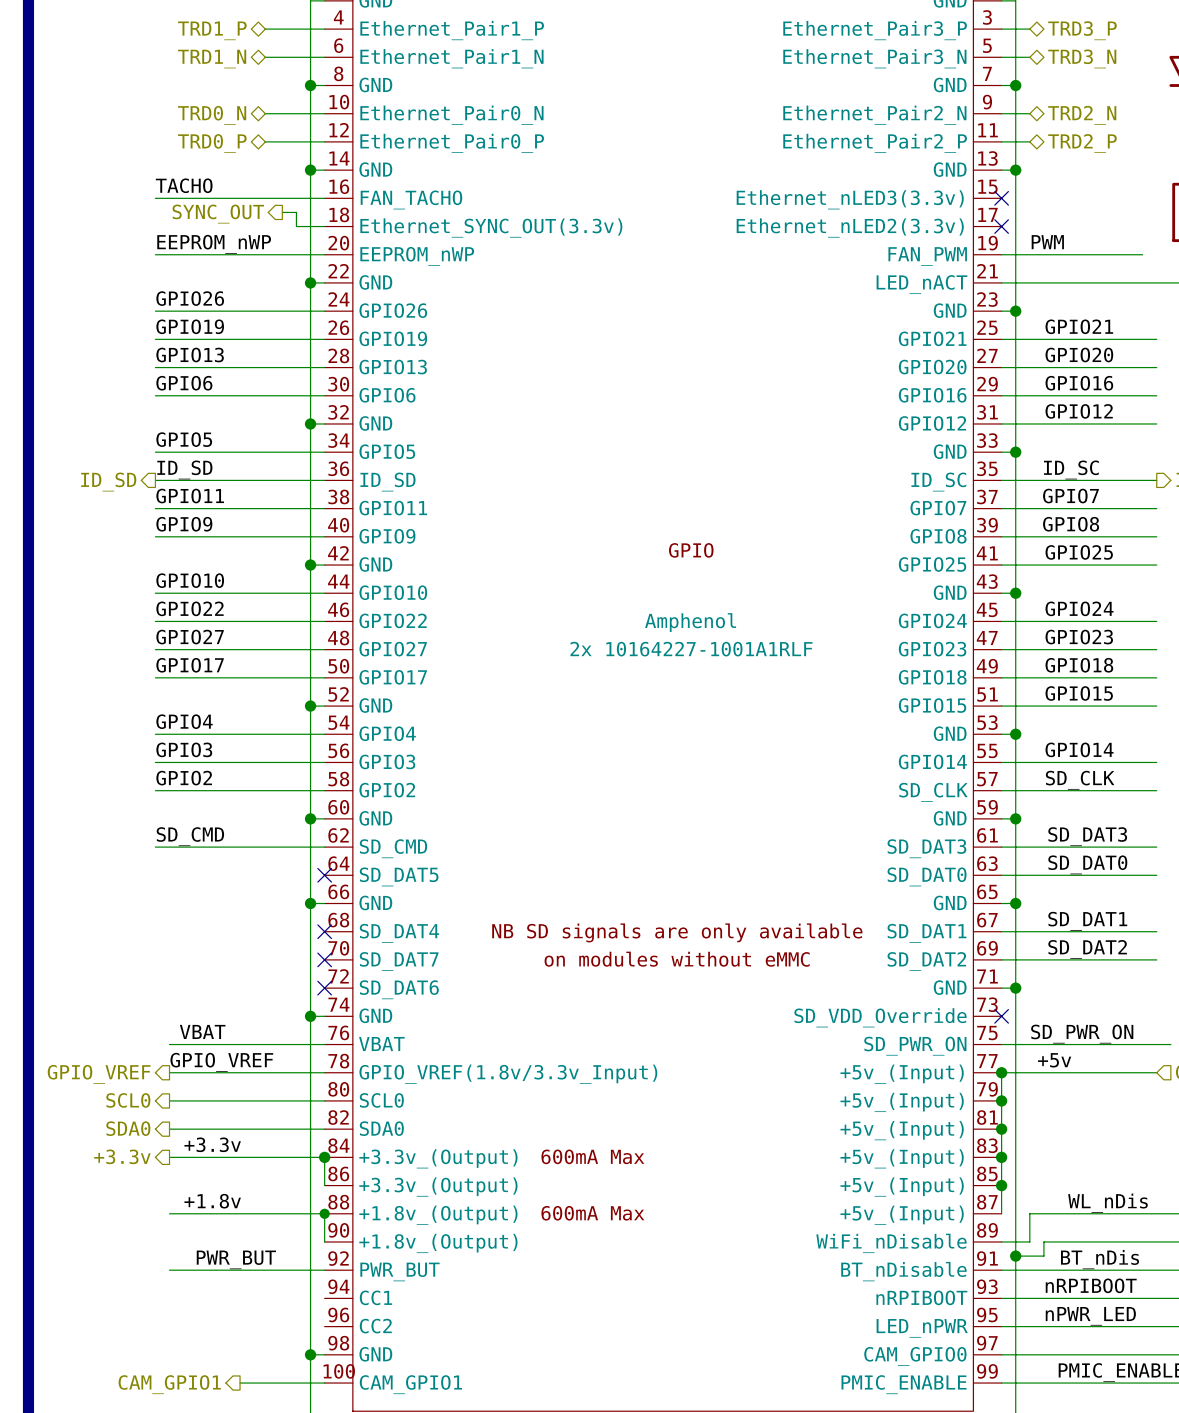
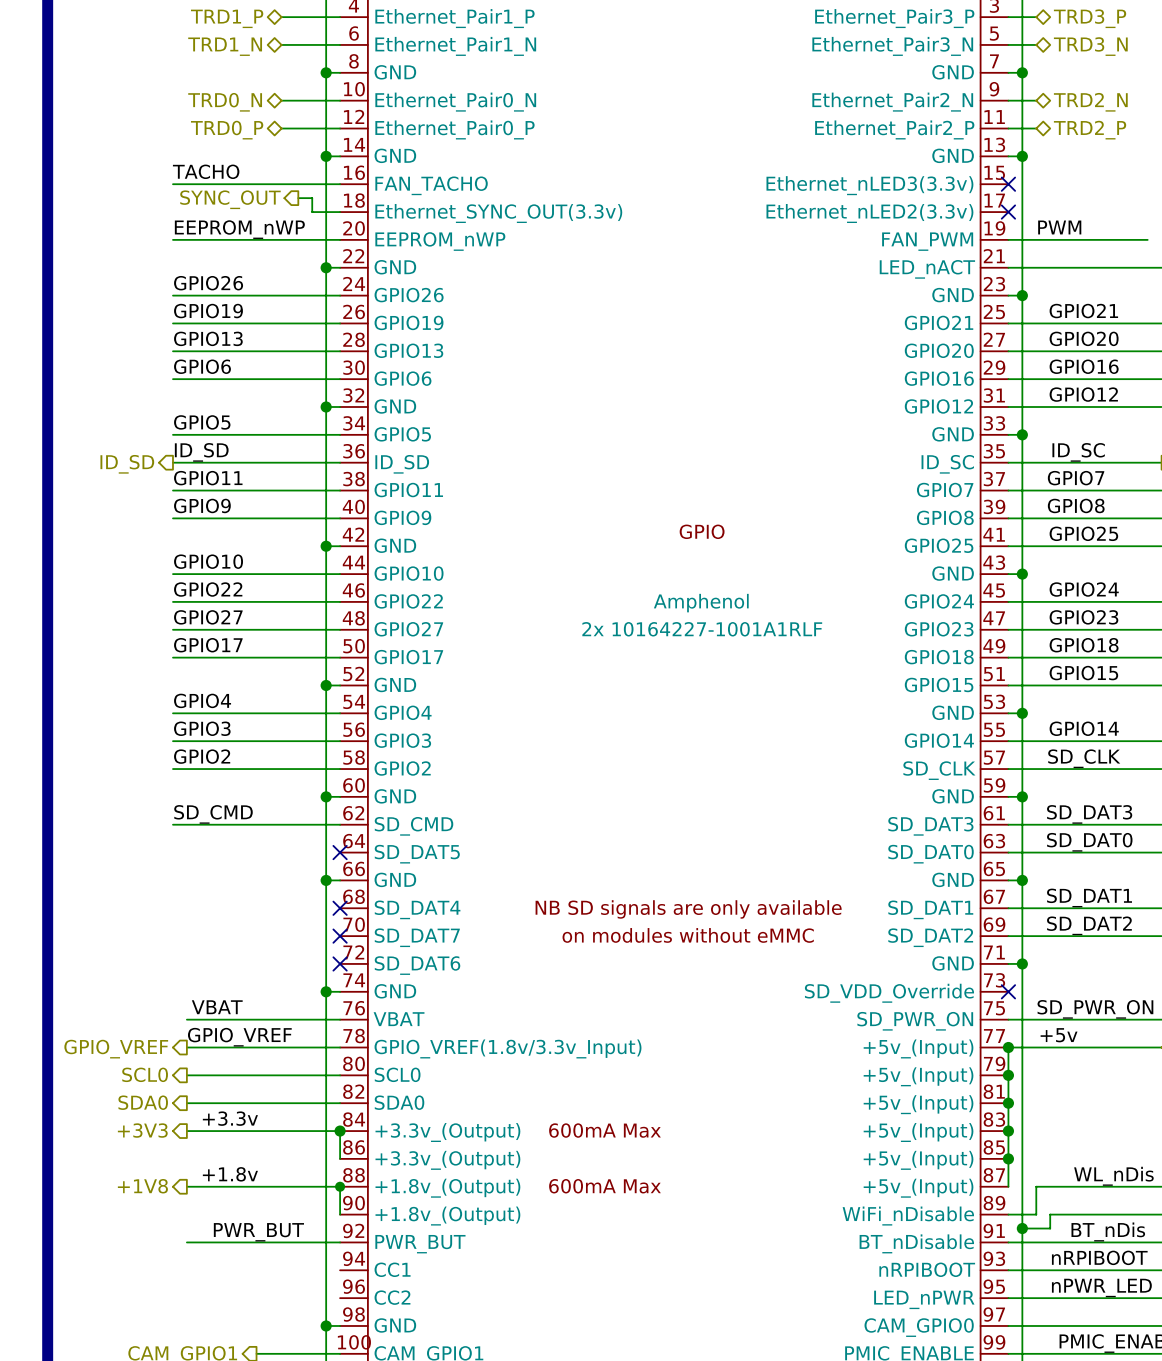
hierarchical label: +3.3v (122, 1156) -> +3V3 (142, 1130)
hierarchical label: none -> +1V8 (142, 1186)

